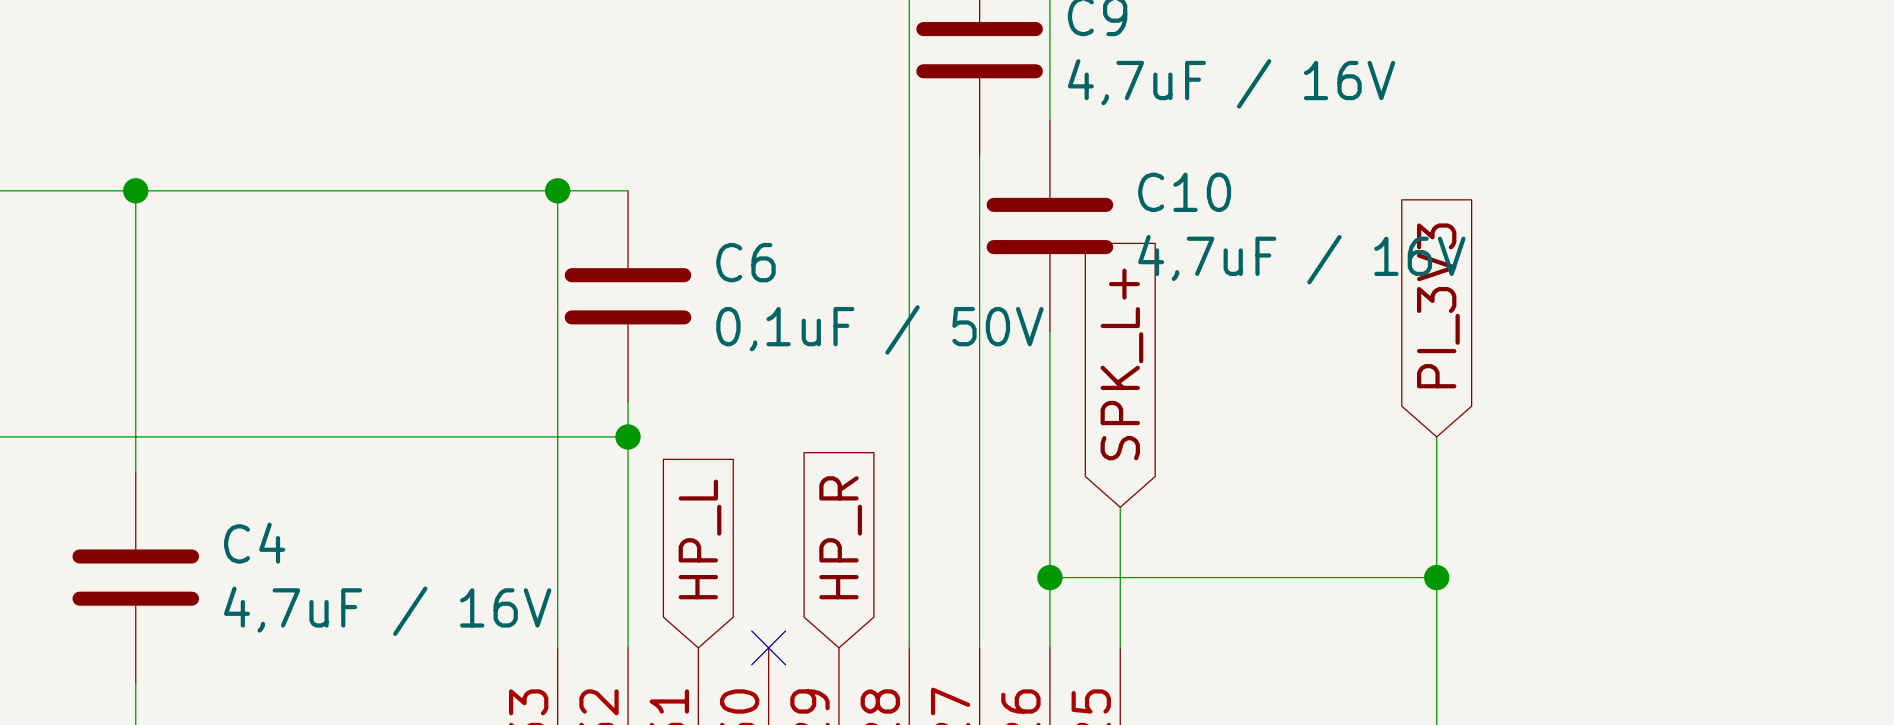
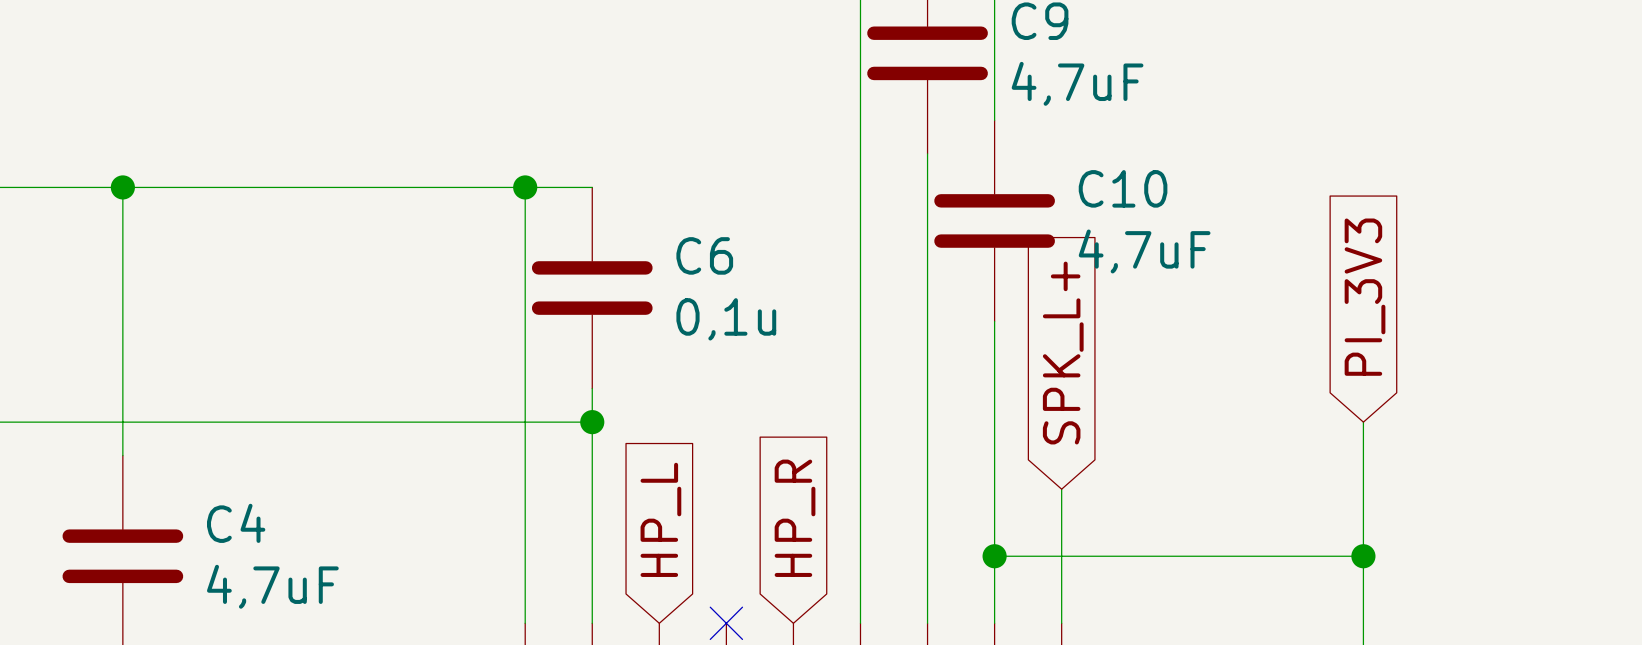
C9 value: 4,7uF / 16V (1231, 83) -> 4,7uF (1077, 83)
C10 value: 4,7uF / 16V (1301, 259) -> 4,7uF (1144, 251)
C6 value: 0,1uF / 50V (879, 329) -> 0,1u (726, 319)
C4 value: 4,7uF / 16V (387, 611) -> 4,7uF (272, 586)

